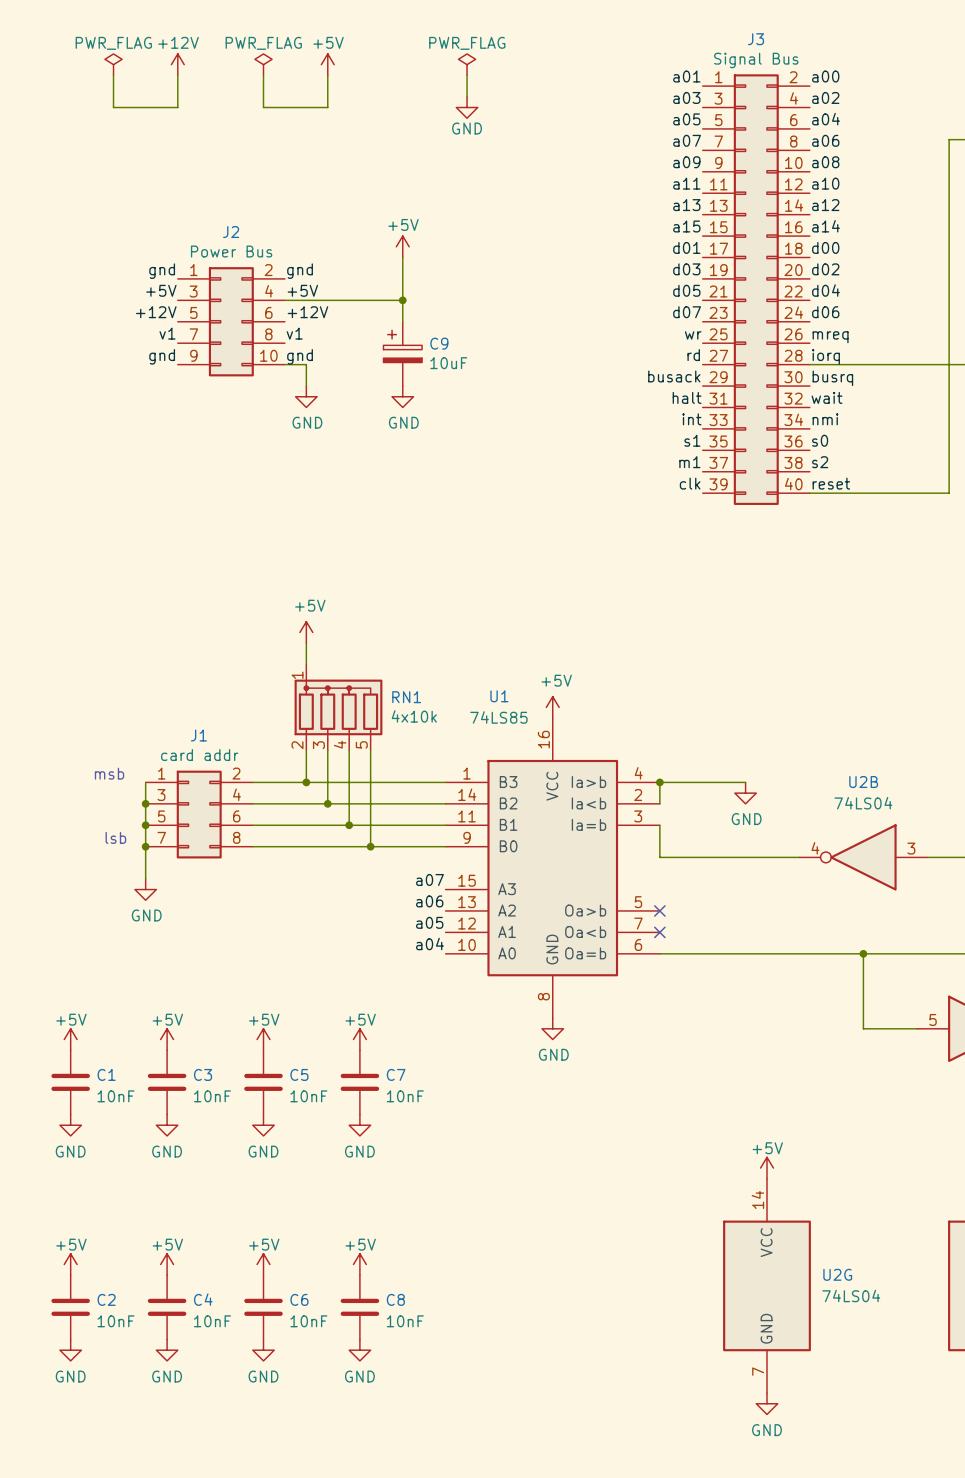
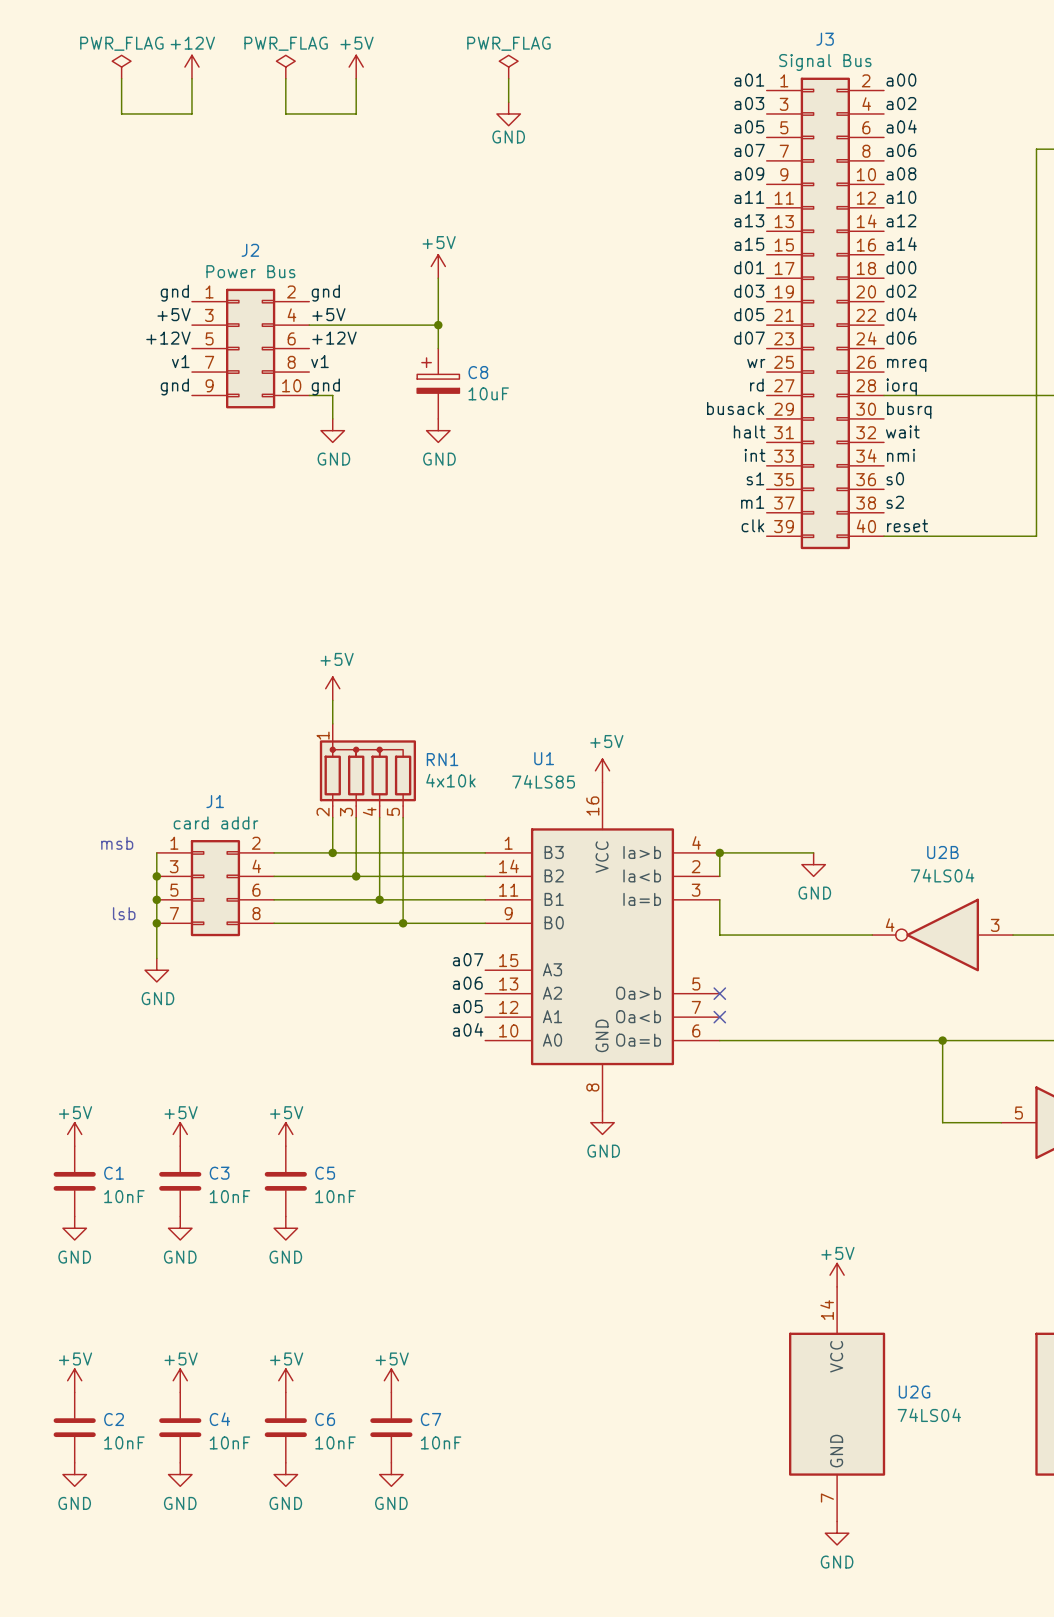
C9 name: C9 (439, 343) -> C8 (478, 372)
power symbol: +5V (359, 1039) -> none
C7: 10nF (359, 1082) -> none
power symbol: GND (359, 1125) -> none
C8 name: C8 (395, 1299) -> C7 (431, 1419)

